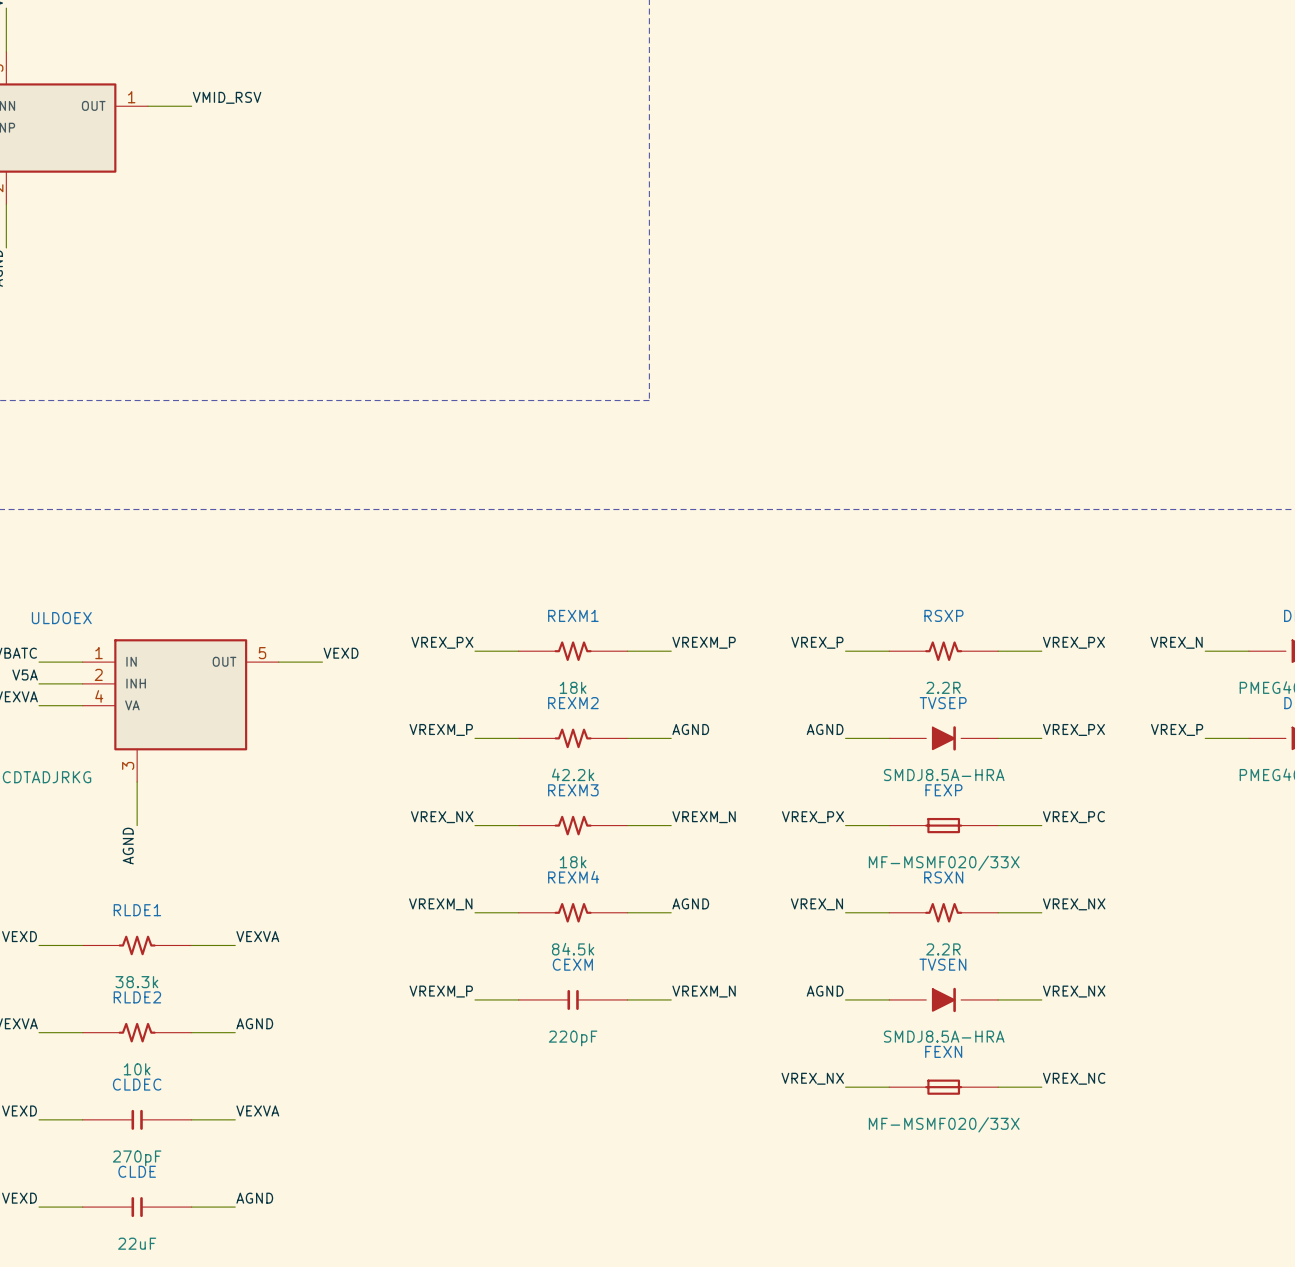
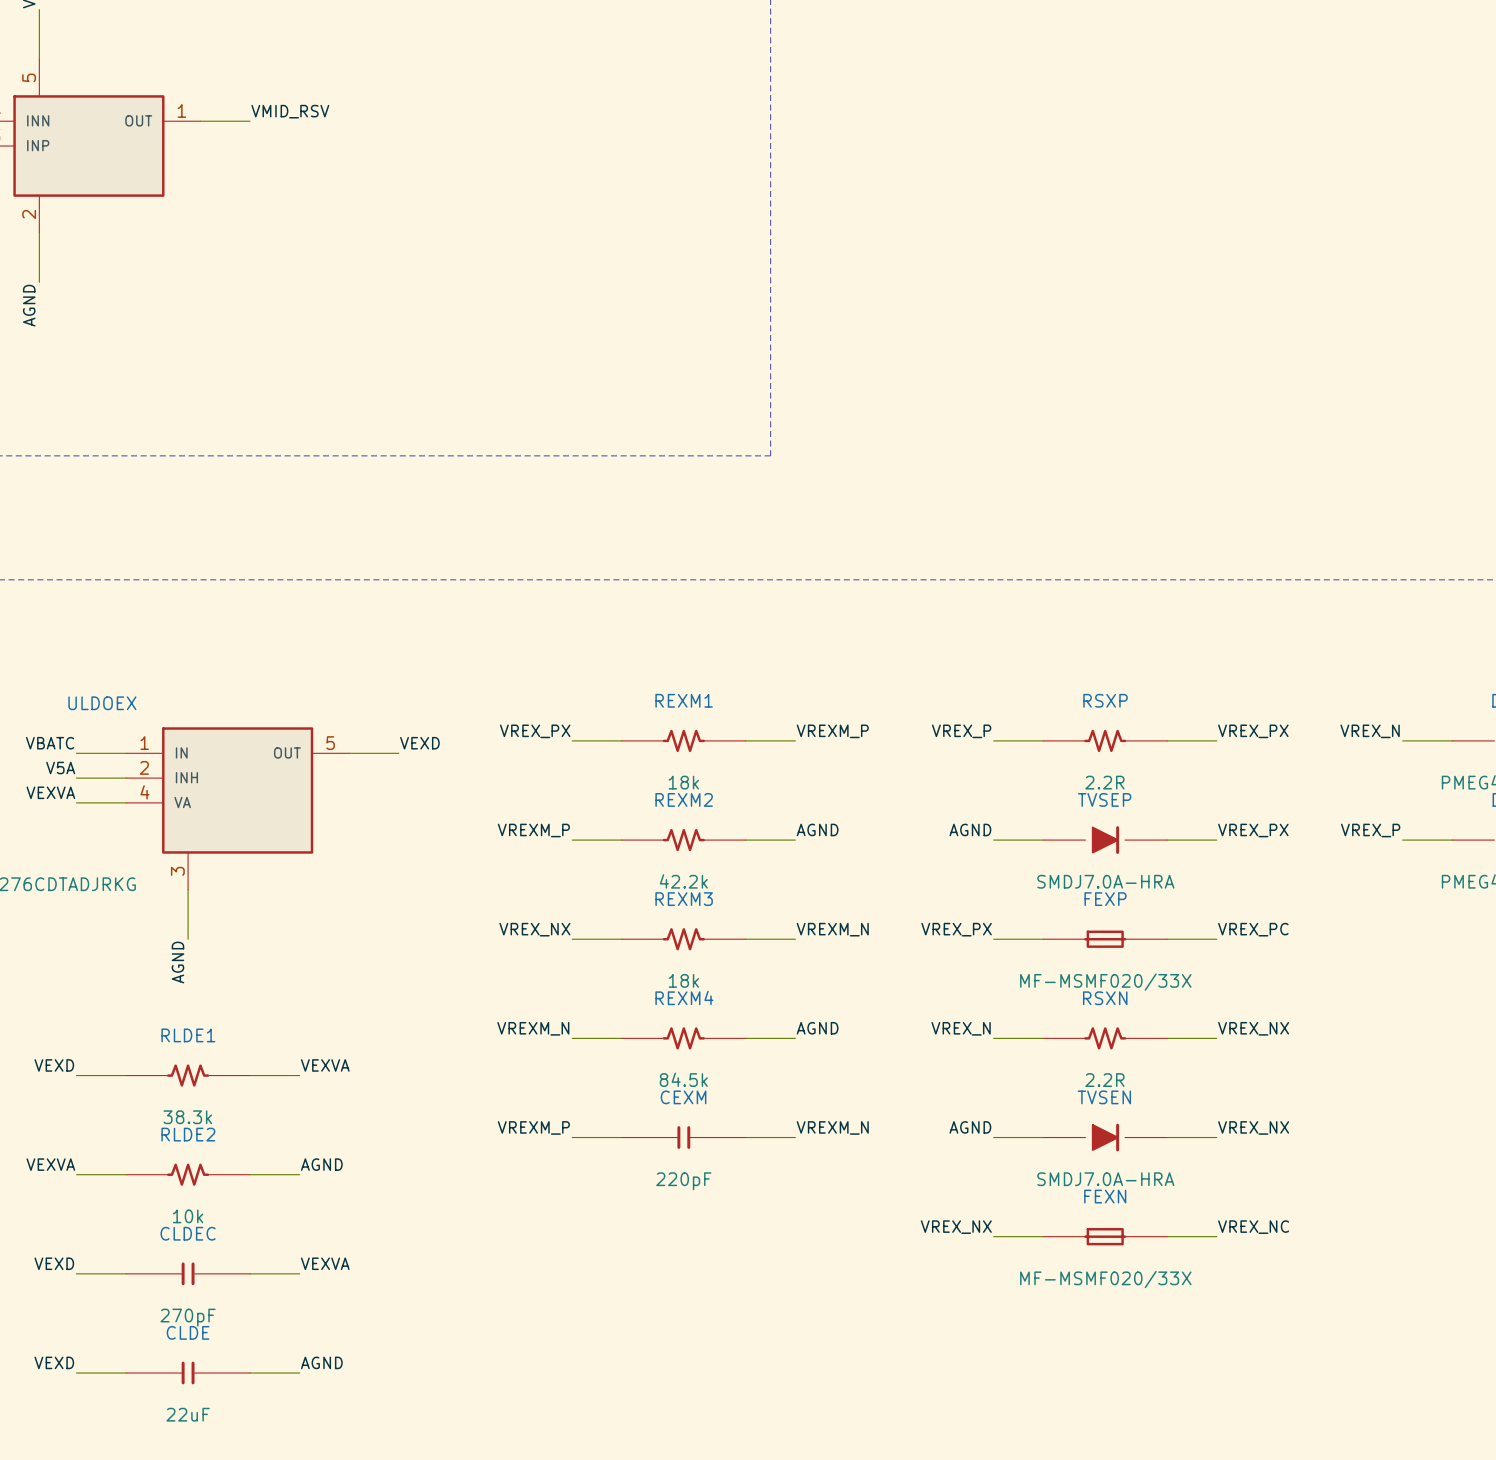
TVSEP value: SMDJ8.5A-HRA (944, 775) -> SMDJ7.0A-HRA (1105, 881)
TVSEN value: SMDJ8.5A-HRA (944, 1036) -> SMDJ7.0A-HRA (1105, 1179)

